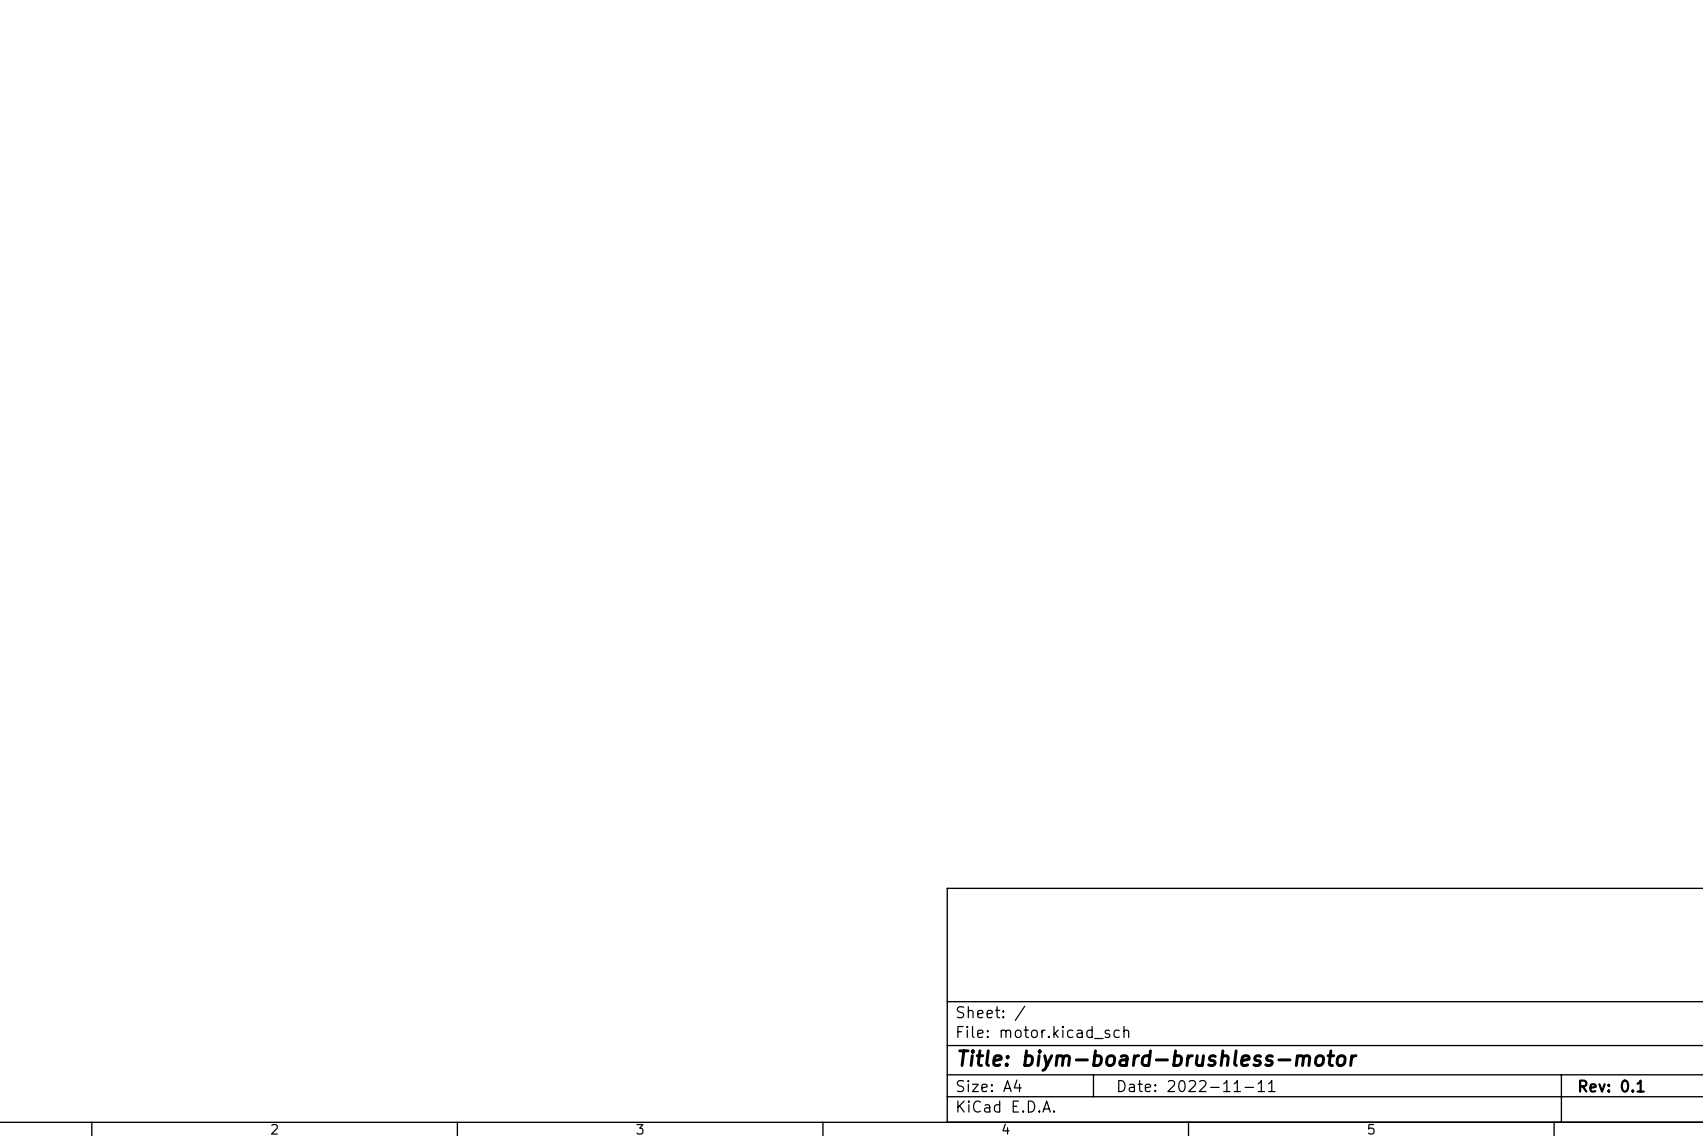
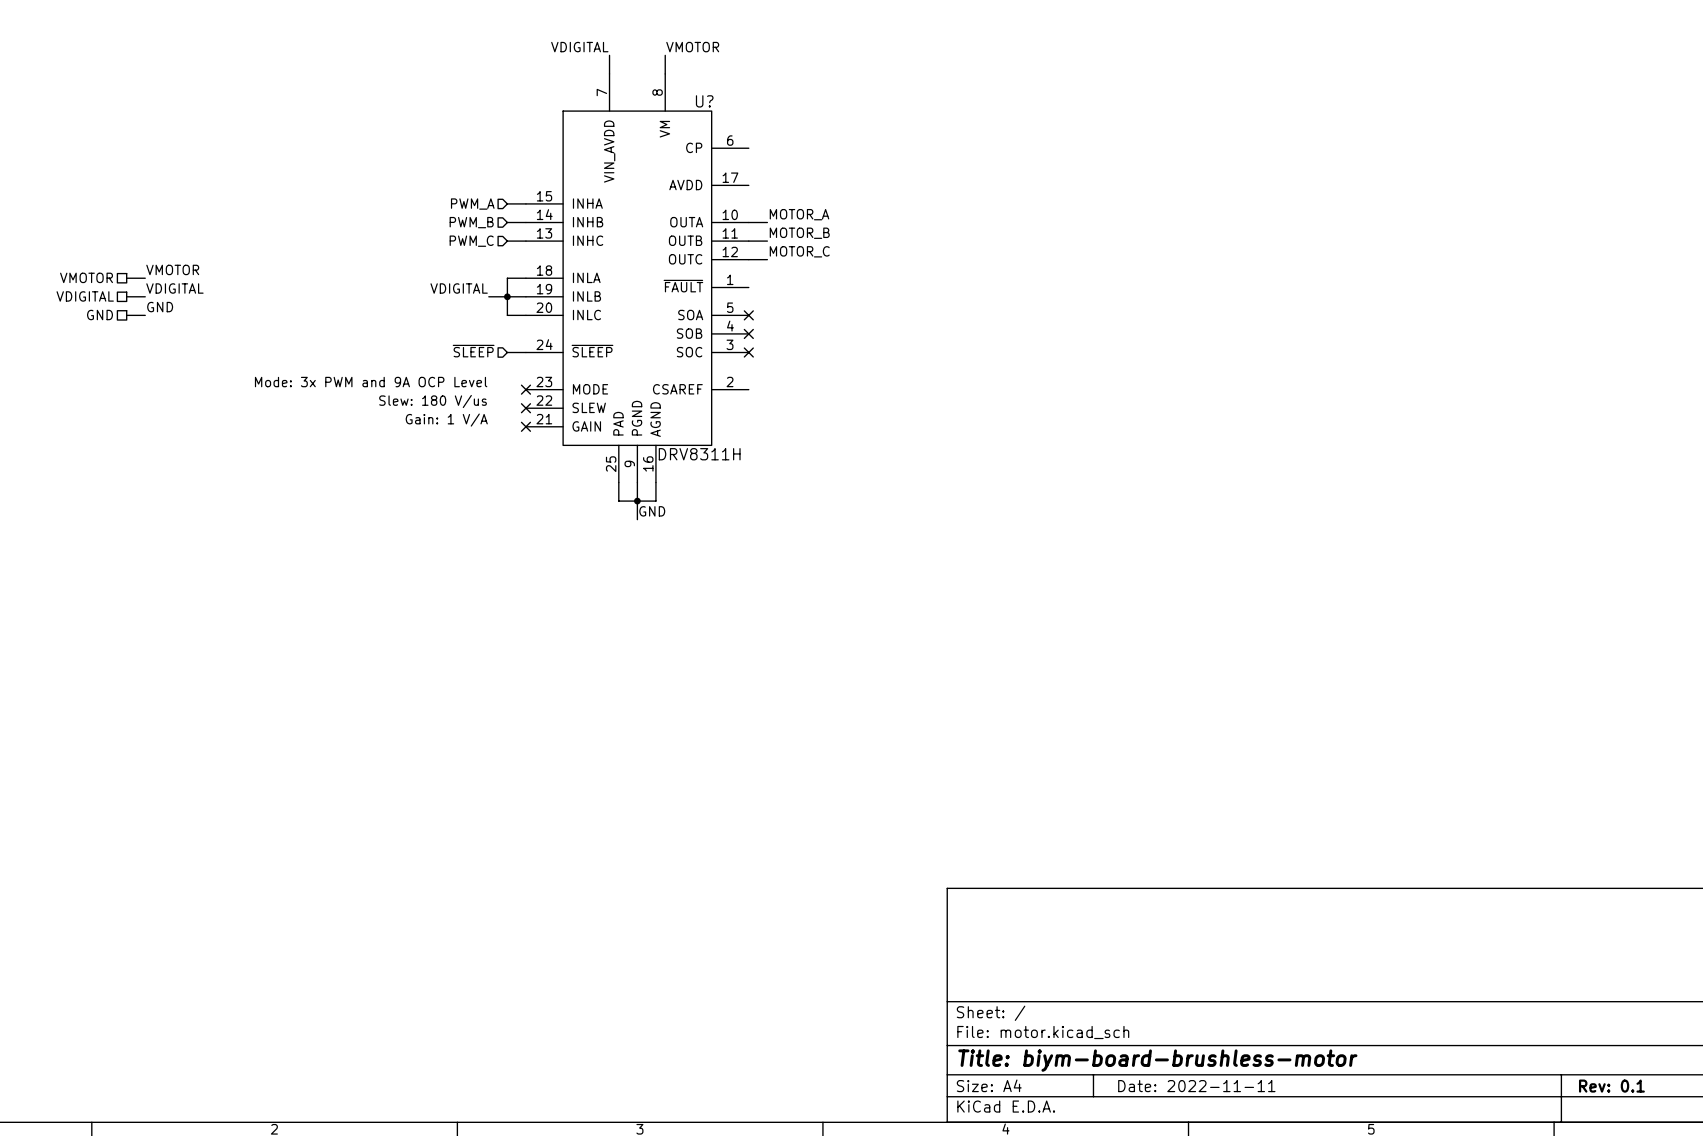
label: none -> VDIGITAL (579, 47)
label: none -> VMOTOR (692, 47)
wire: none -> (609, 55) (609, 73)
wire: none -> (665, 55) (665, 73)
wire: none -> (507, 203) (525, 203)
hierarchical label: none -> PWM_A (472, 204)
label: none -> MOTOR_A (799, 214)
hierarchical label: none -> PWM_B (471, 222)
wire: none -> (507, 222) (525, 222)
wire: none -> (748, 222) (767, 222)
label: none -> MOTOR_B (799, 233)
hierarchical label: none -> PWM_C (471, 241)
wire: none -> (507, 241) (525, 241)
wire: none -> (748, 241) (767, 241)
label: none -> MOTOR_C (799, 251)
wire: none -> (748, 259) (767, 259)
label: none -> VMOTOR (172, 269)
hierarchical label: none -> VMOTOR (86, 277)
wire: none -> (126, 278) (145, 278)
wire: none -> (525, 278) (507, 278) (507, 315) (525, 315)
U?: none -> DRV8311H (637, 278)
label: none -> VDIGITAL (174, 288)
label: none -> VDIGITAL (459, 288)
hierarchical label: none -> VDIGITAL (85, 296)
wire: none -> (126, 296) (145, 296)
wire: none -> (488, 296) (525, 296)
junction: none -> (507, 296)
label: none -> GND (160, 307)
hierarchical label: none -> GND (100, 315)
wire: none -> (126, 315) (145, 315)
no-connect mark: none -> (748, 315)
no-connect mark: none -> (748, 333)
hierarchical label: none -> ~{SLEEP} (473, 351)
wire: none -> (507, 352) (525, 352)
no-connect mark: none -> (748, 352)
text: none -> Mode: 3x PWM and 9A OCP Level (371, 382)
no-connect mark: none -> (525, 389)
text: none -> Slew: 180 V/us (433, 401)
no-connect mark: none -> (525, 408)
text: none -> Gain: 1 V/A (446, 420)
no-connect mark: none -> (525, 426)
wire: none -> (618, 482) (618, 501) (655, 501) (655, 482)
wire: none -> (637, 482) (637, 519)
junction: none -> (637, 501)
label: none -> GND (652, 511)

